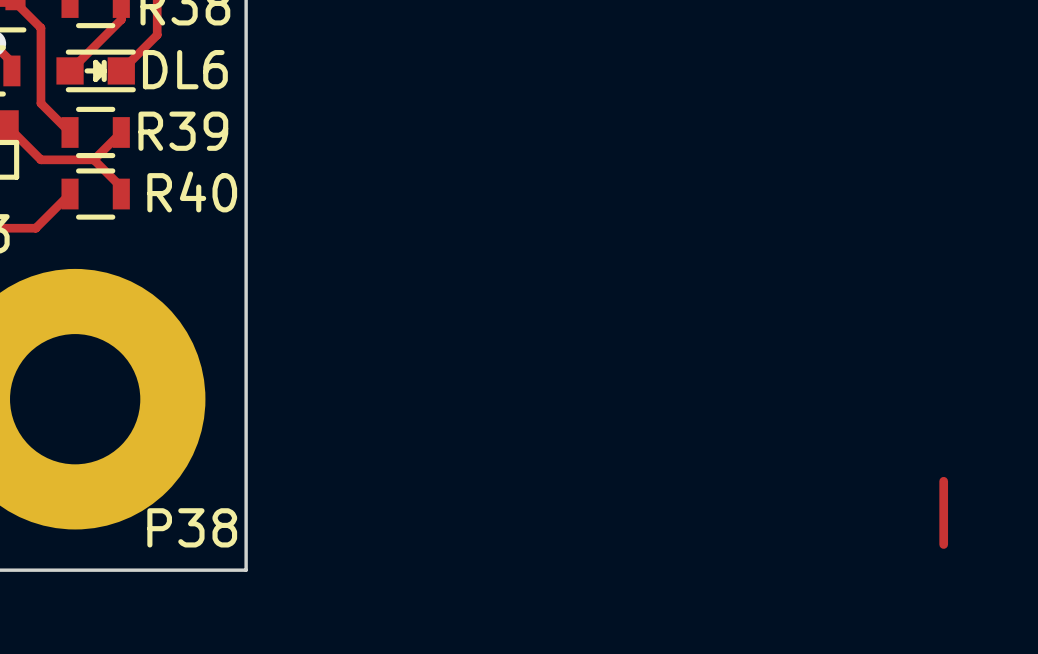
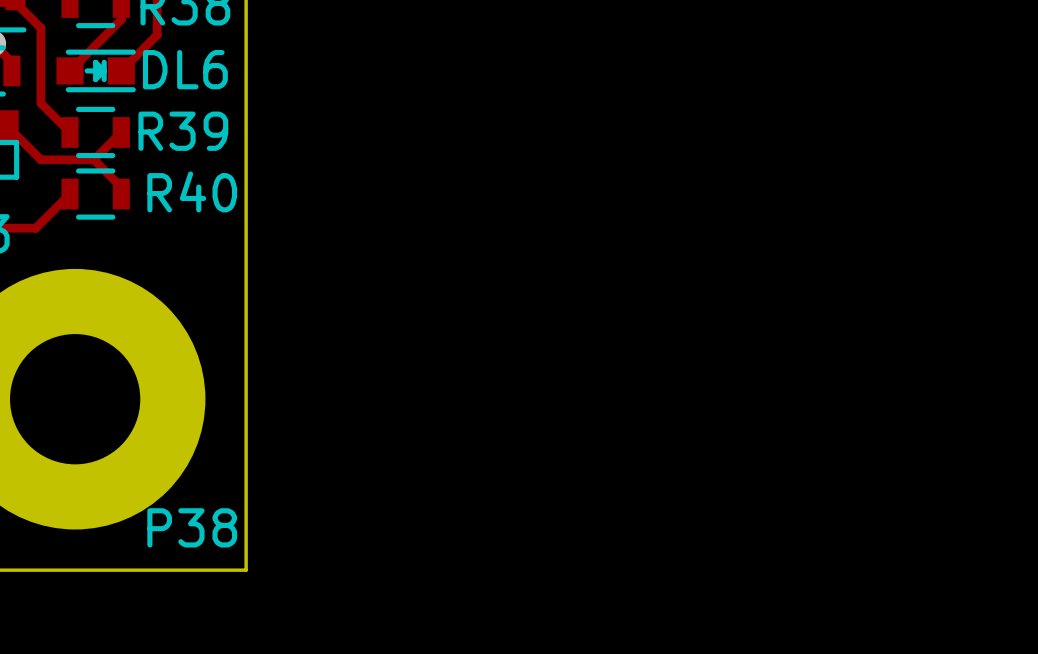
track: (943, 481) (943, 544) -> none

